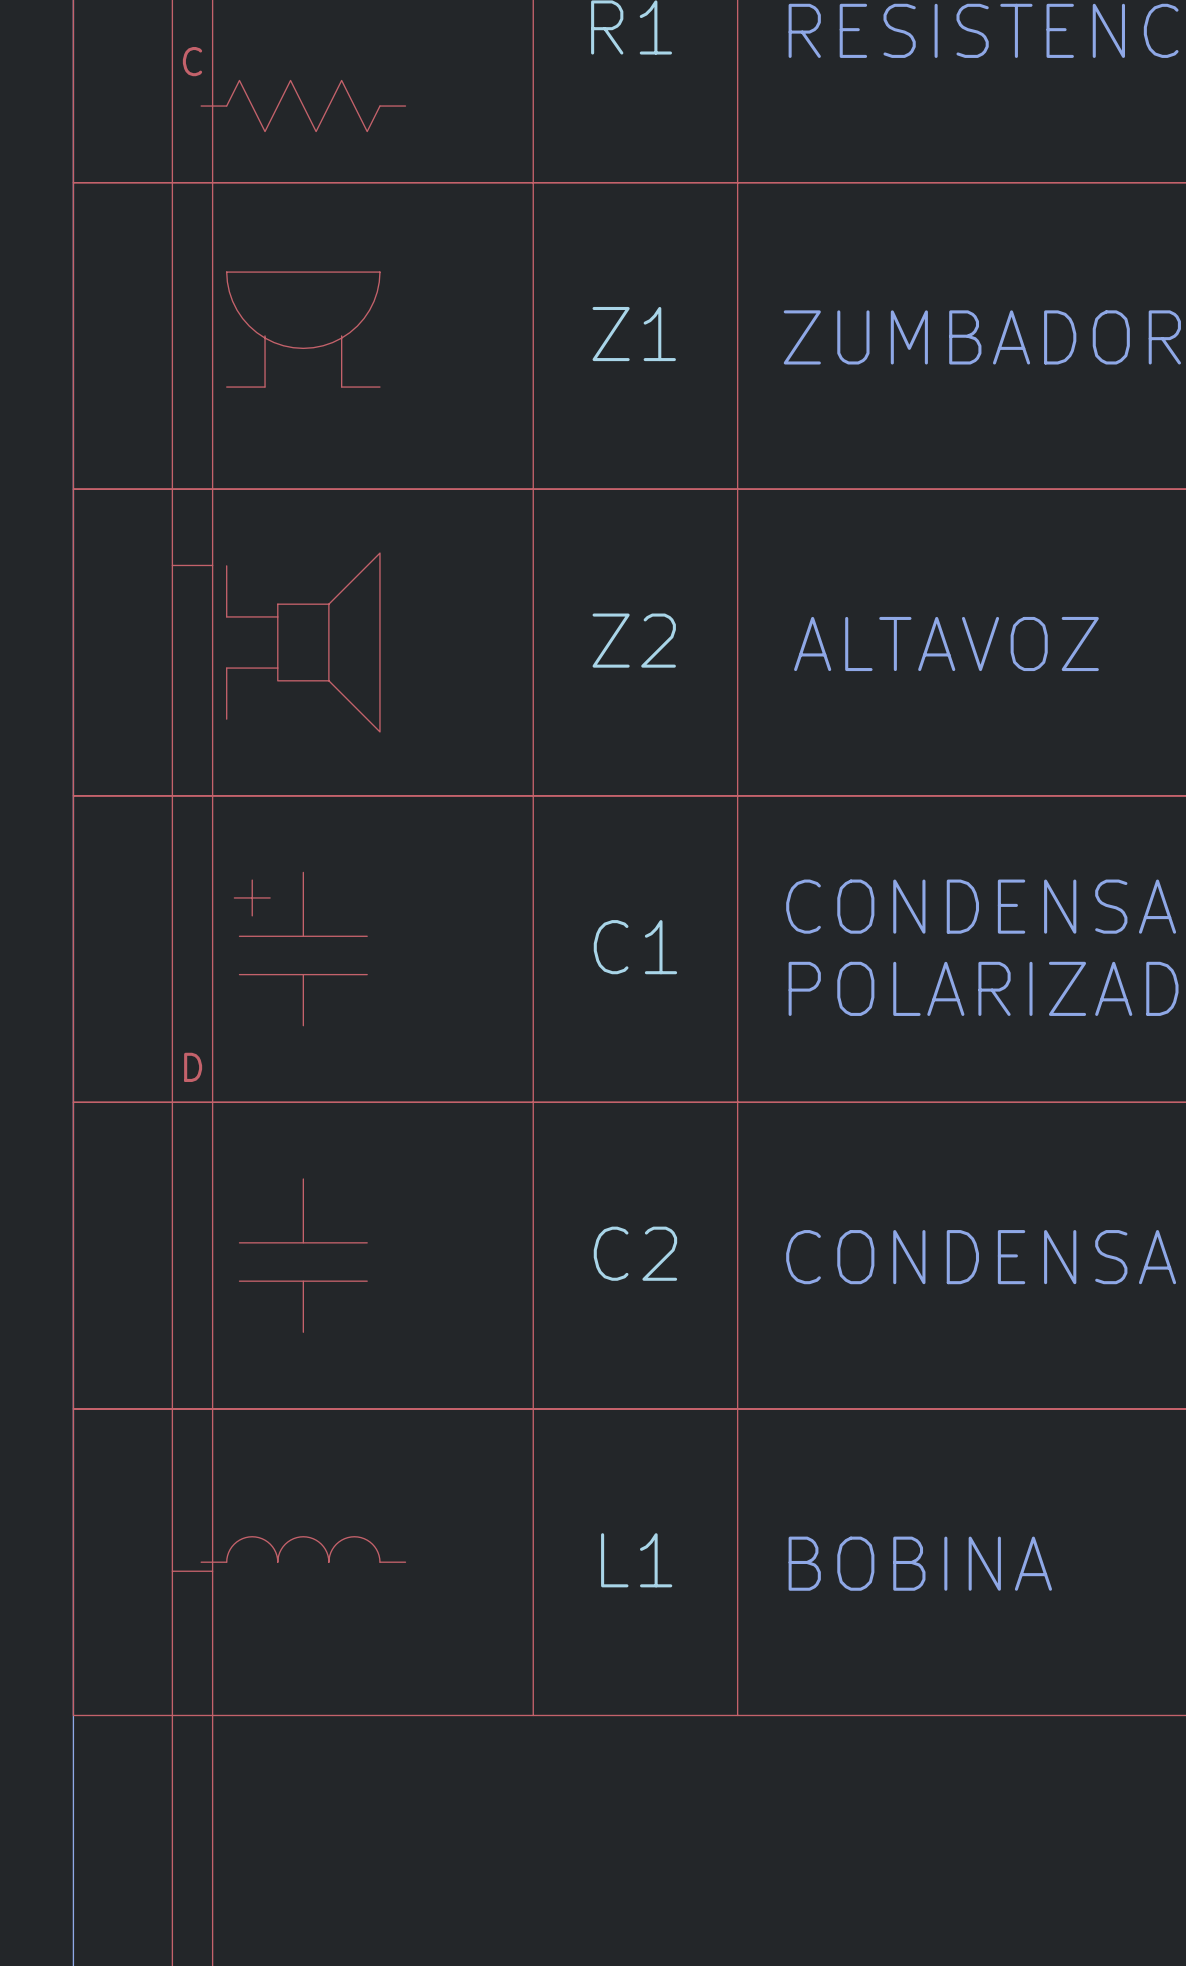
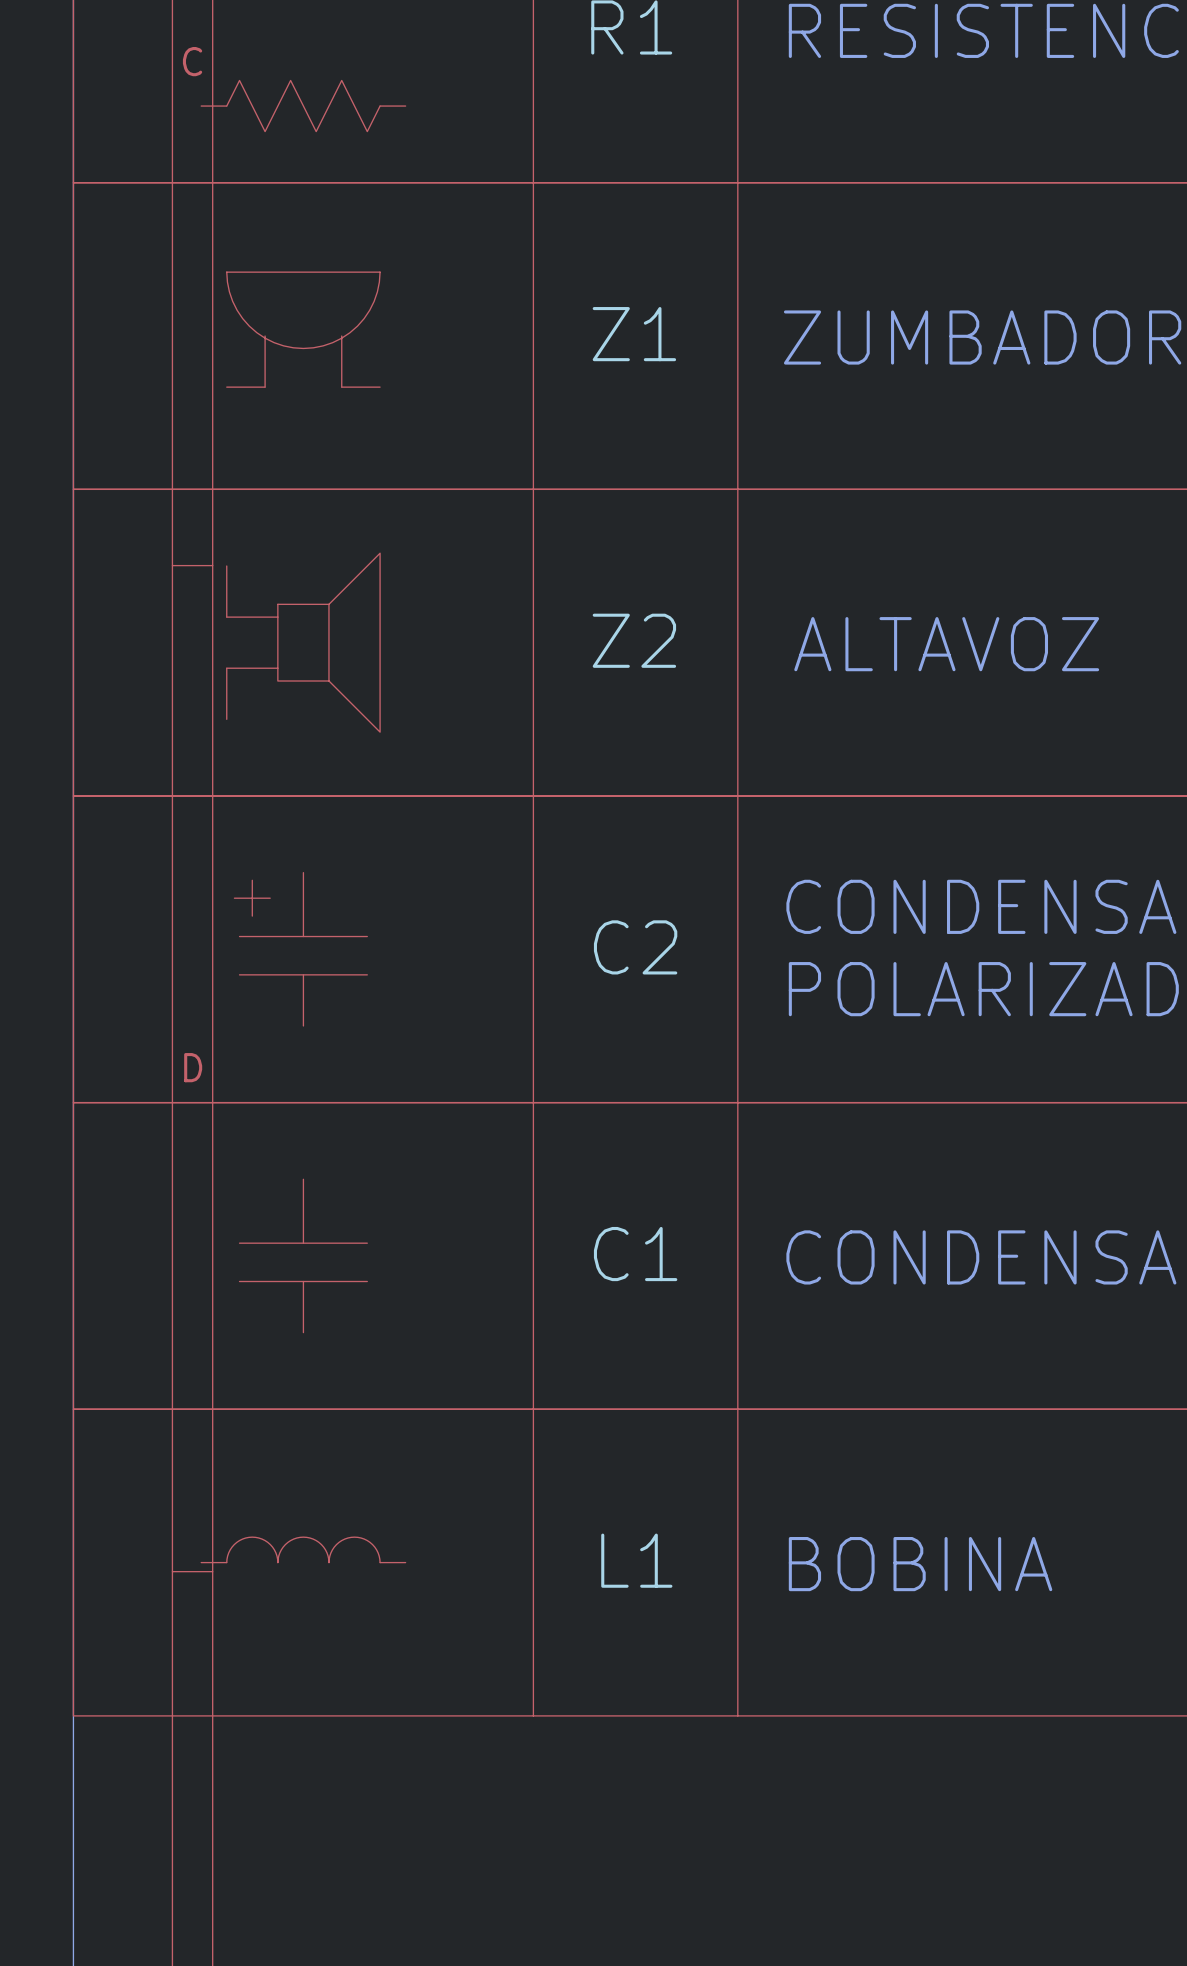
C1 name: C1 (635, 947) -> C2 (635, 947)
C2 name: C2 (635, 1253) -> C1 (635, 1254)

